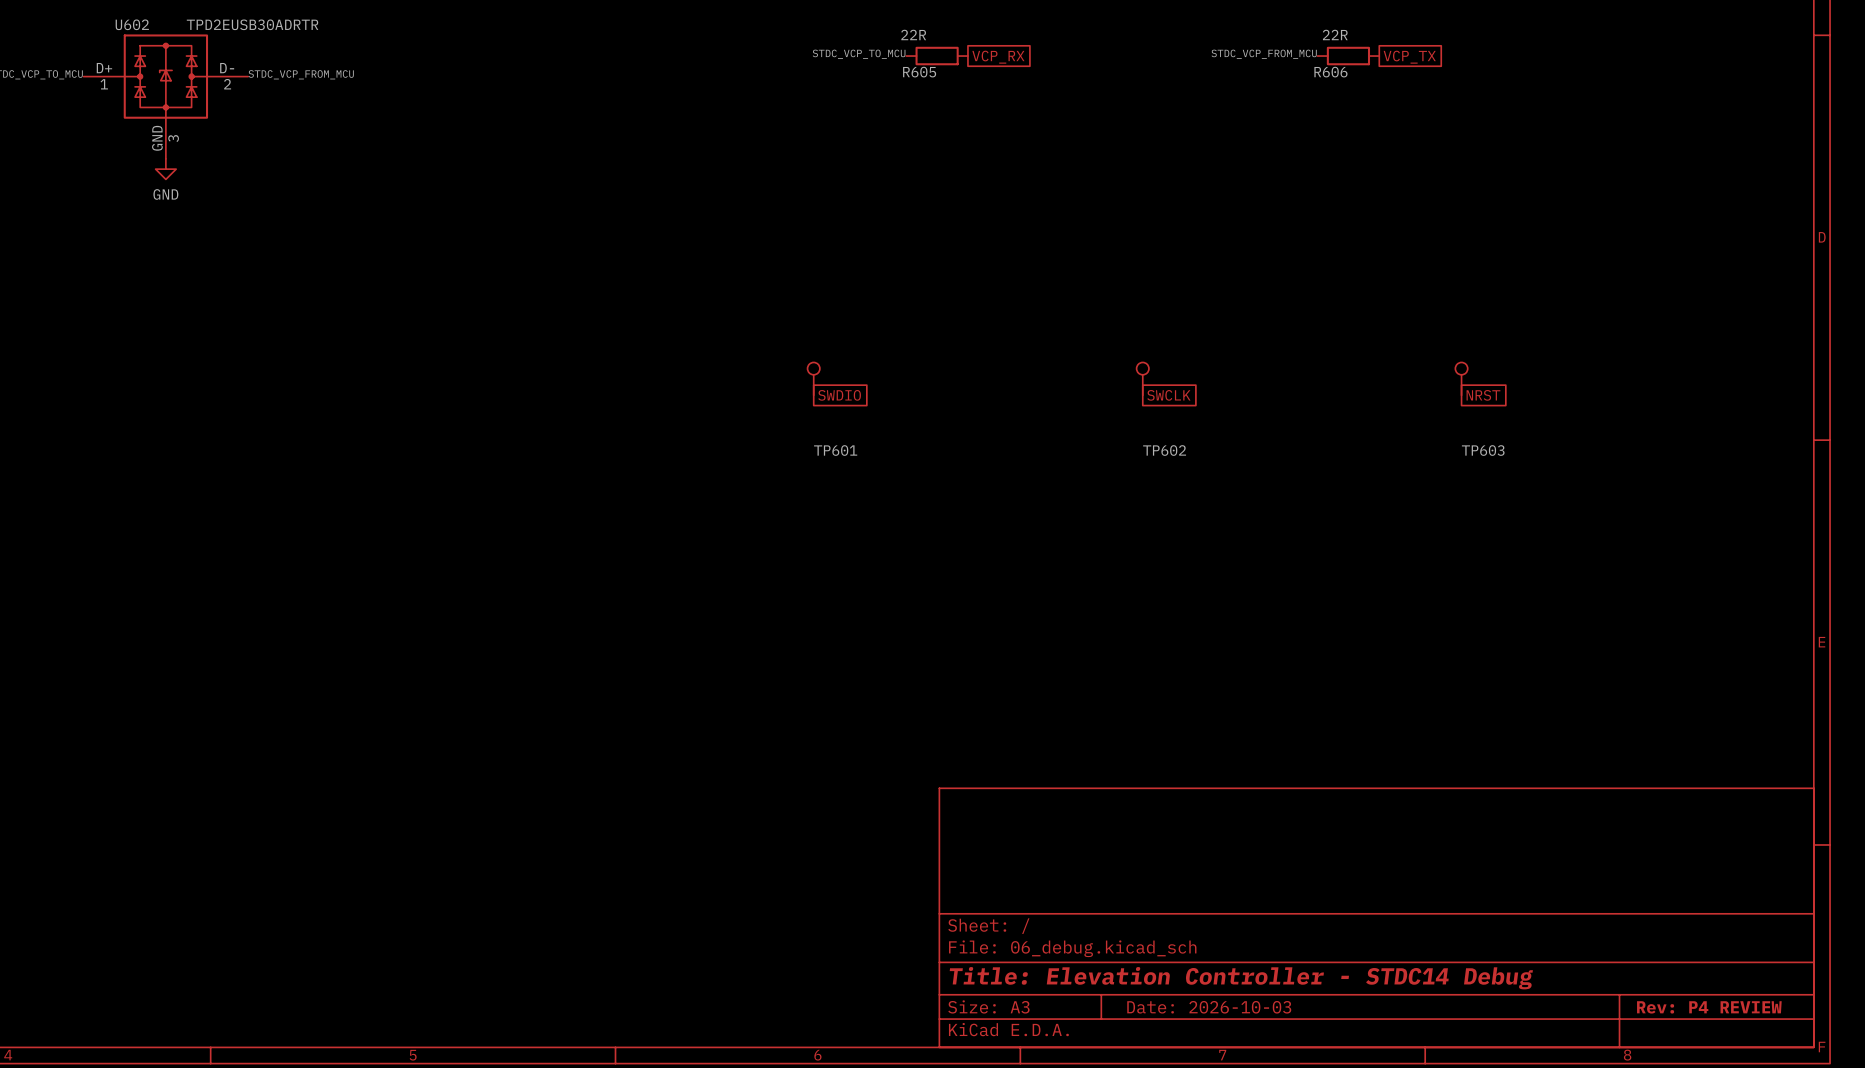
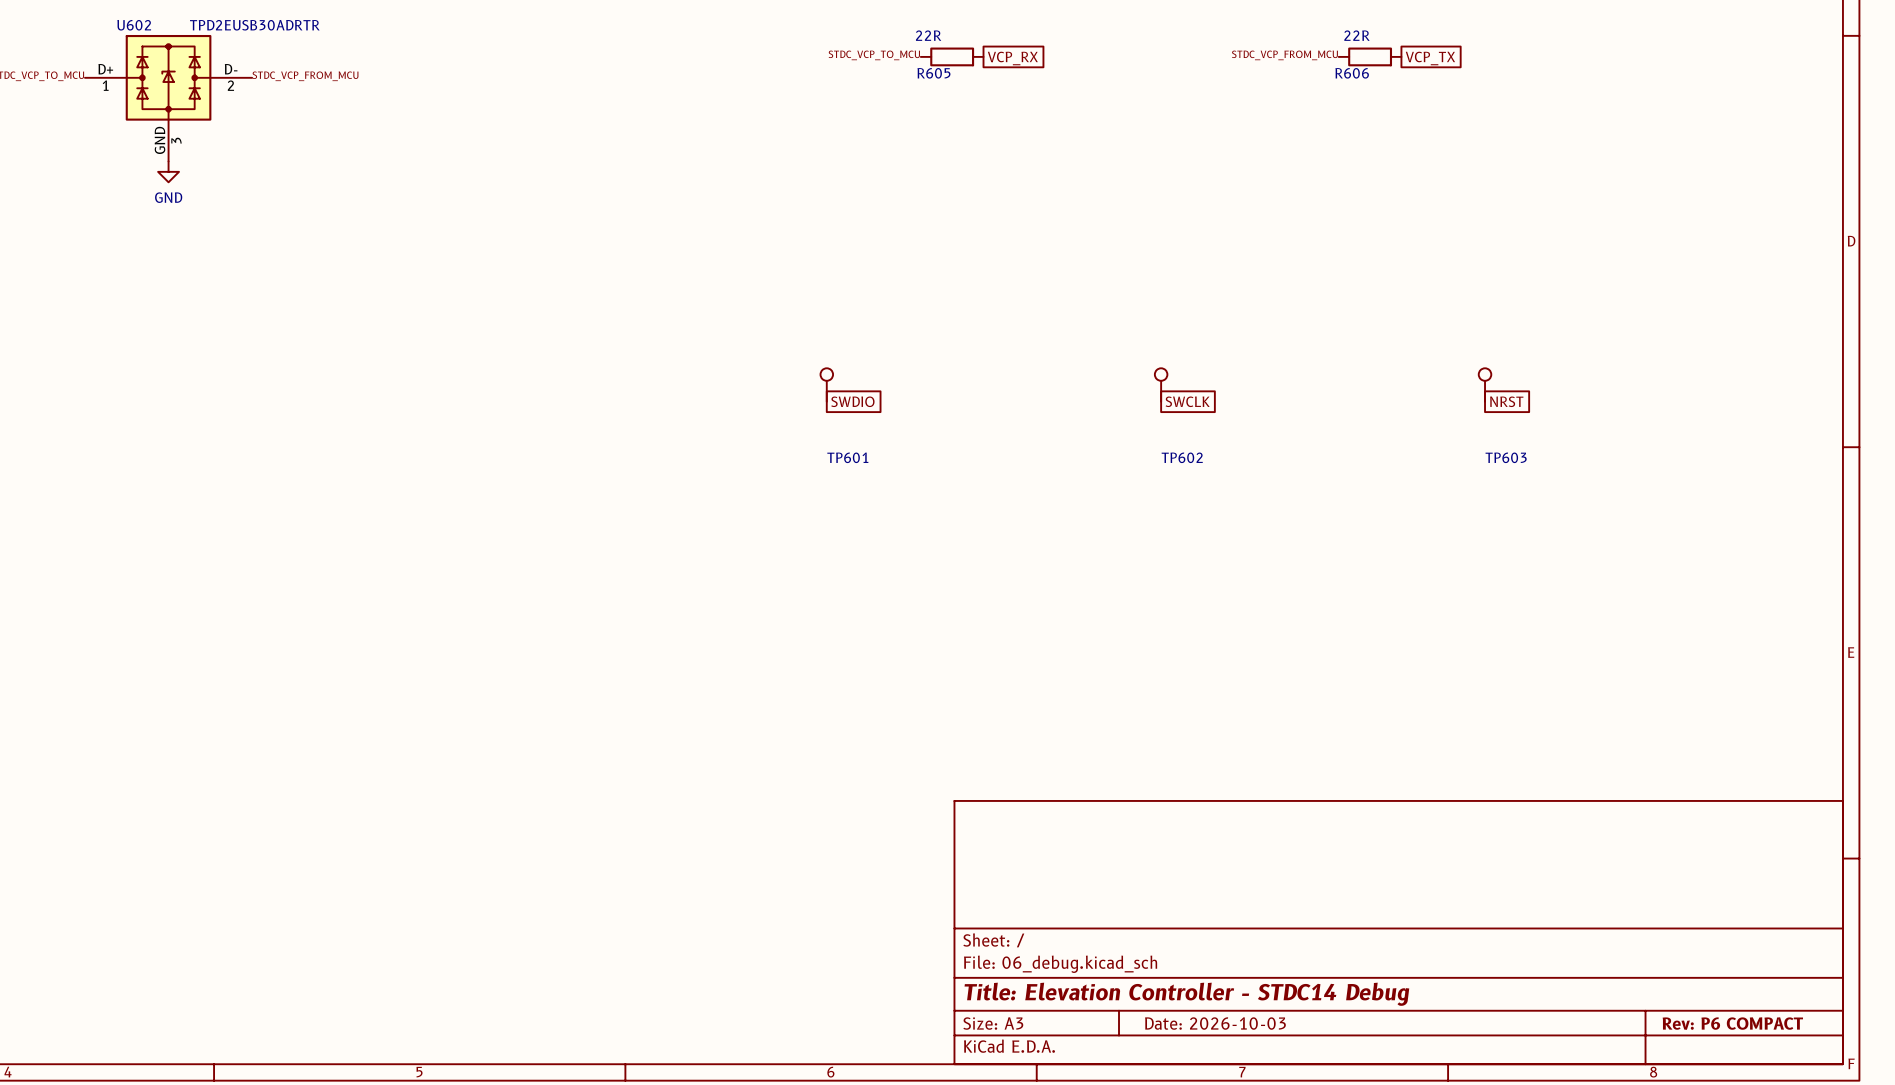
title block: Rev: P4 REVIEW (1709, 1007) -> Rev: P6 COMPACT (1732, 1023)

